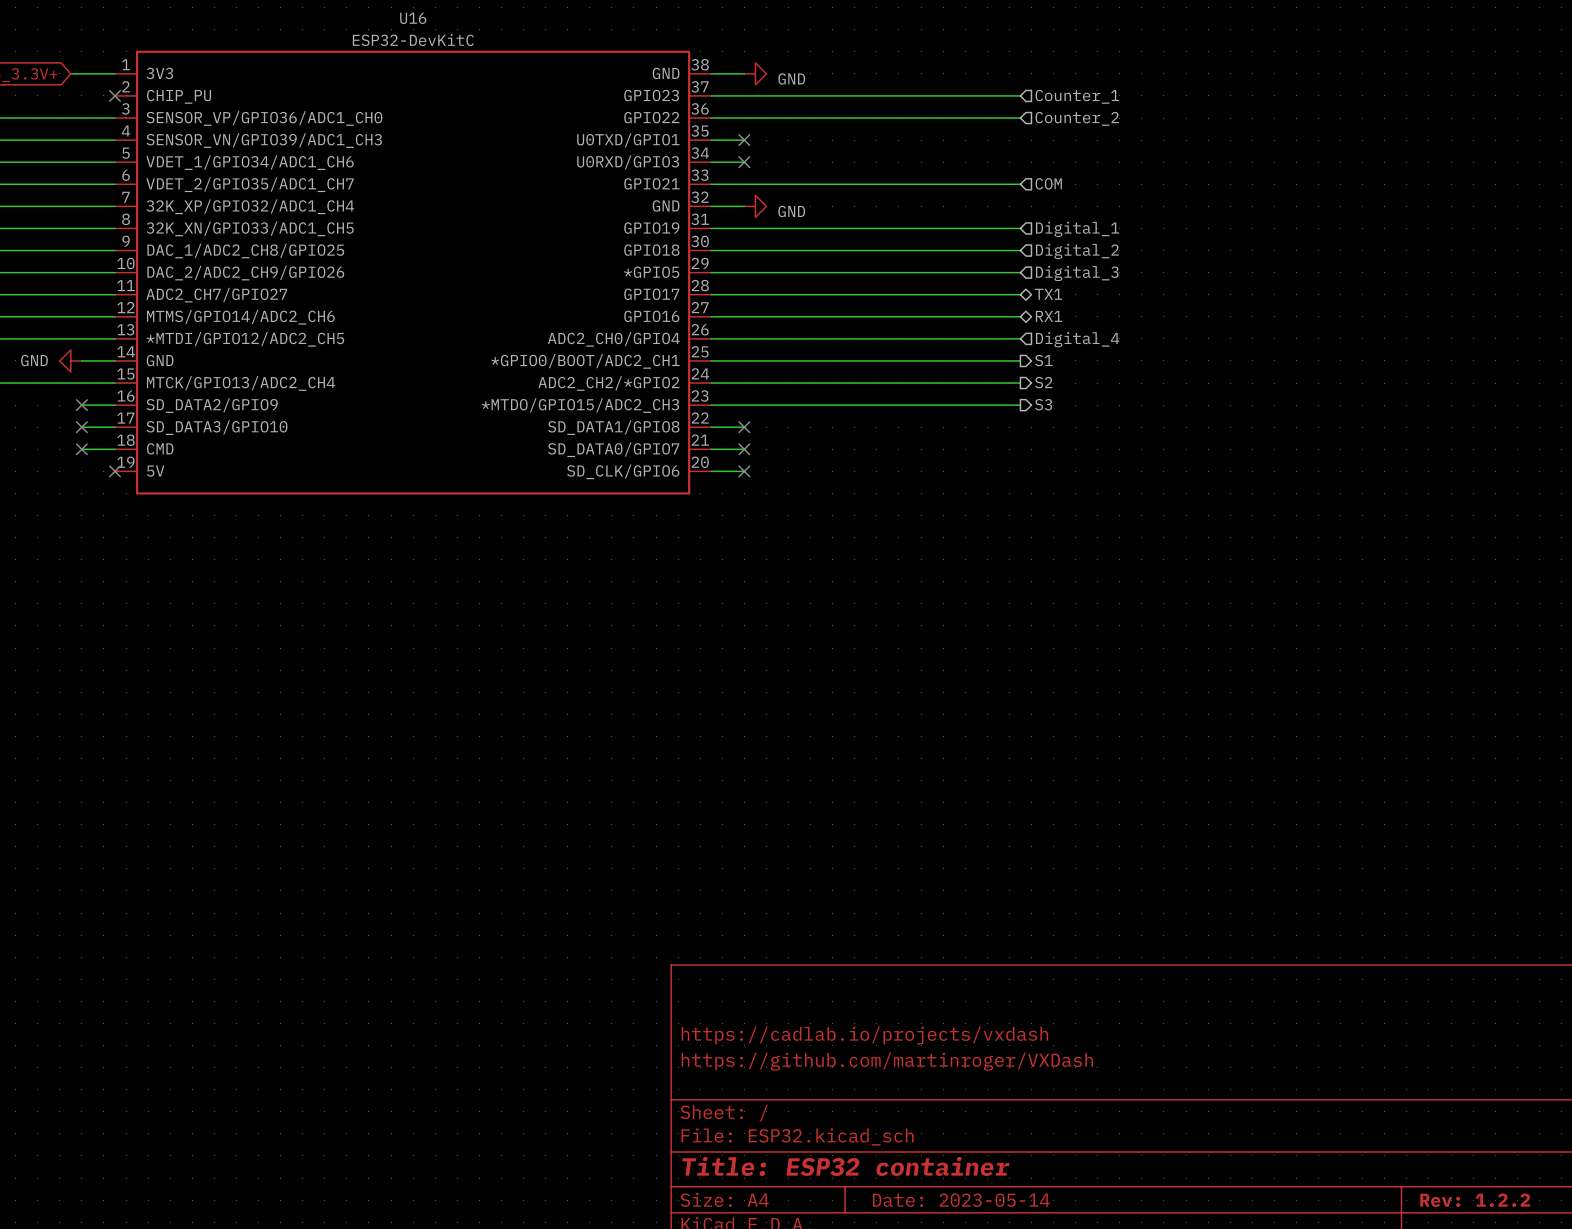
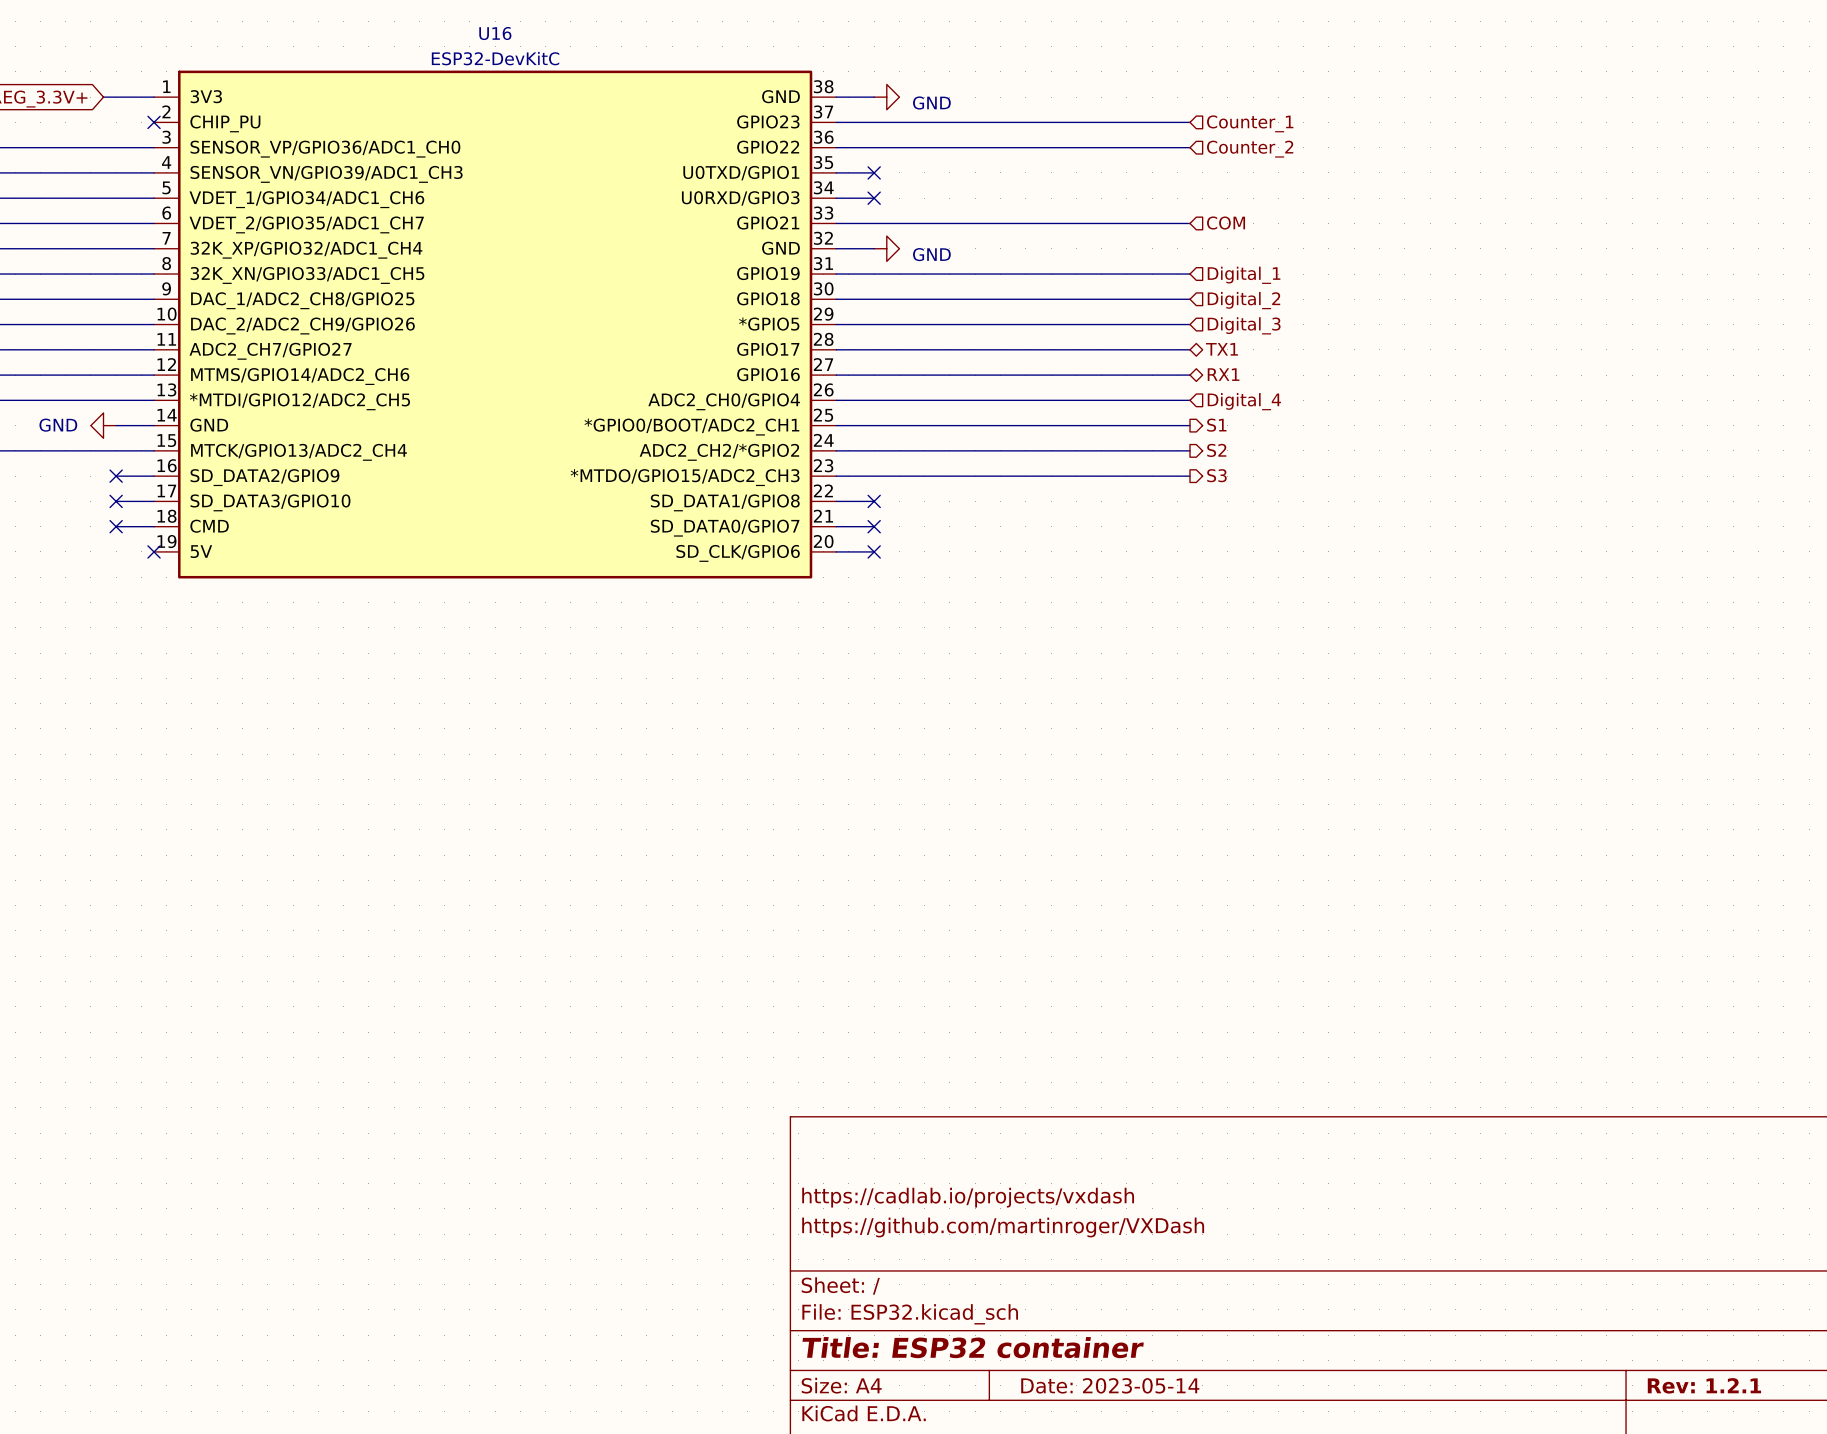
title block: Rev: 1.2.2 (1475, 1200) -> Rev: 1.2.1 (1704, 1385)

